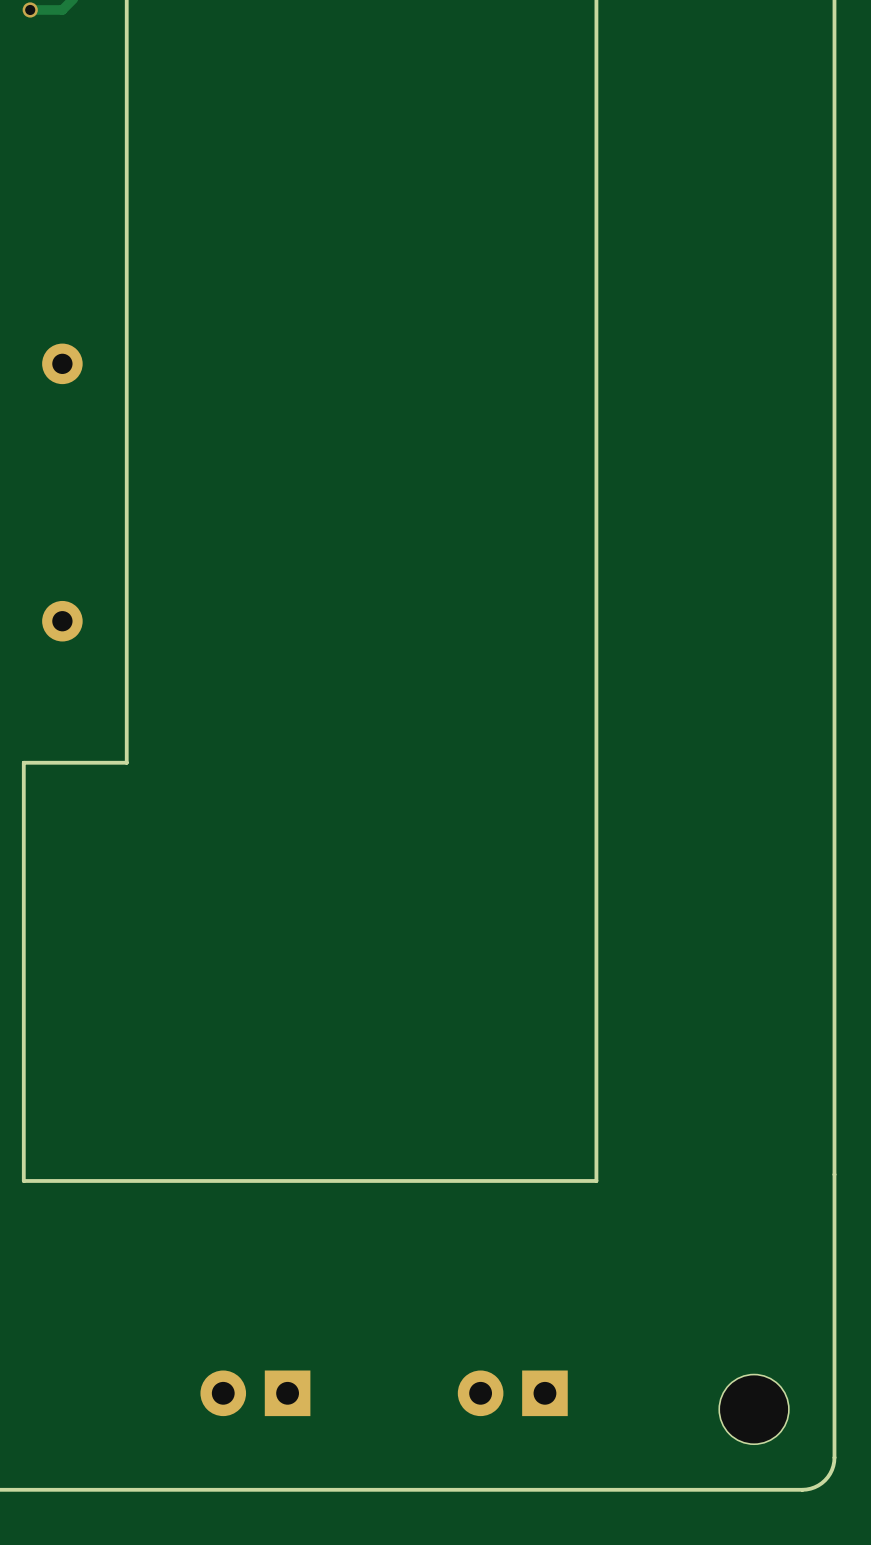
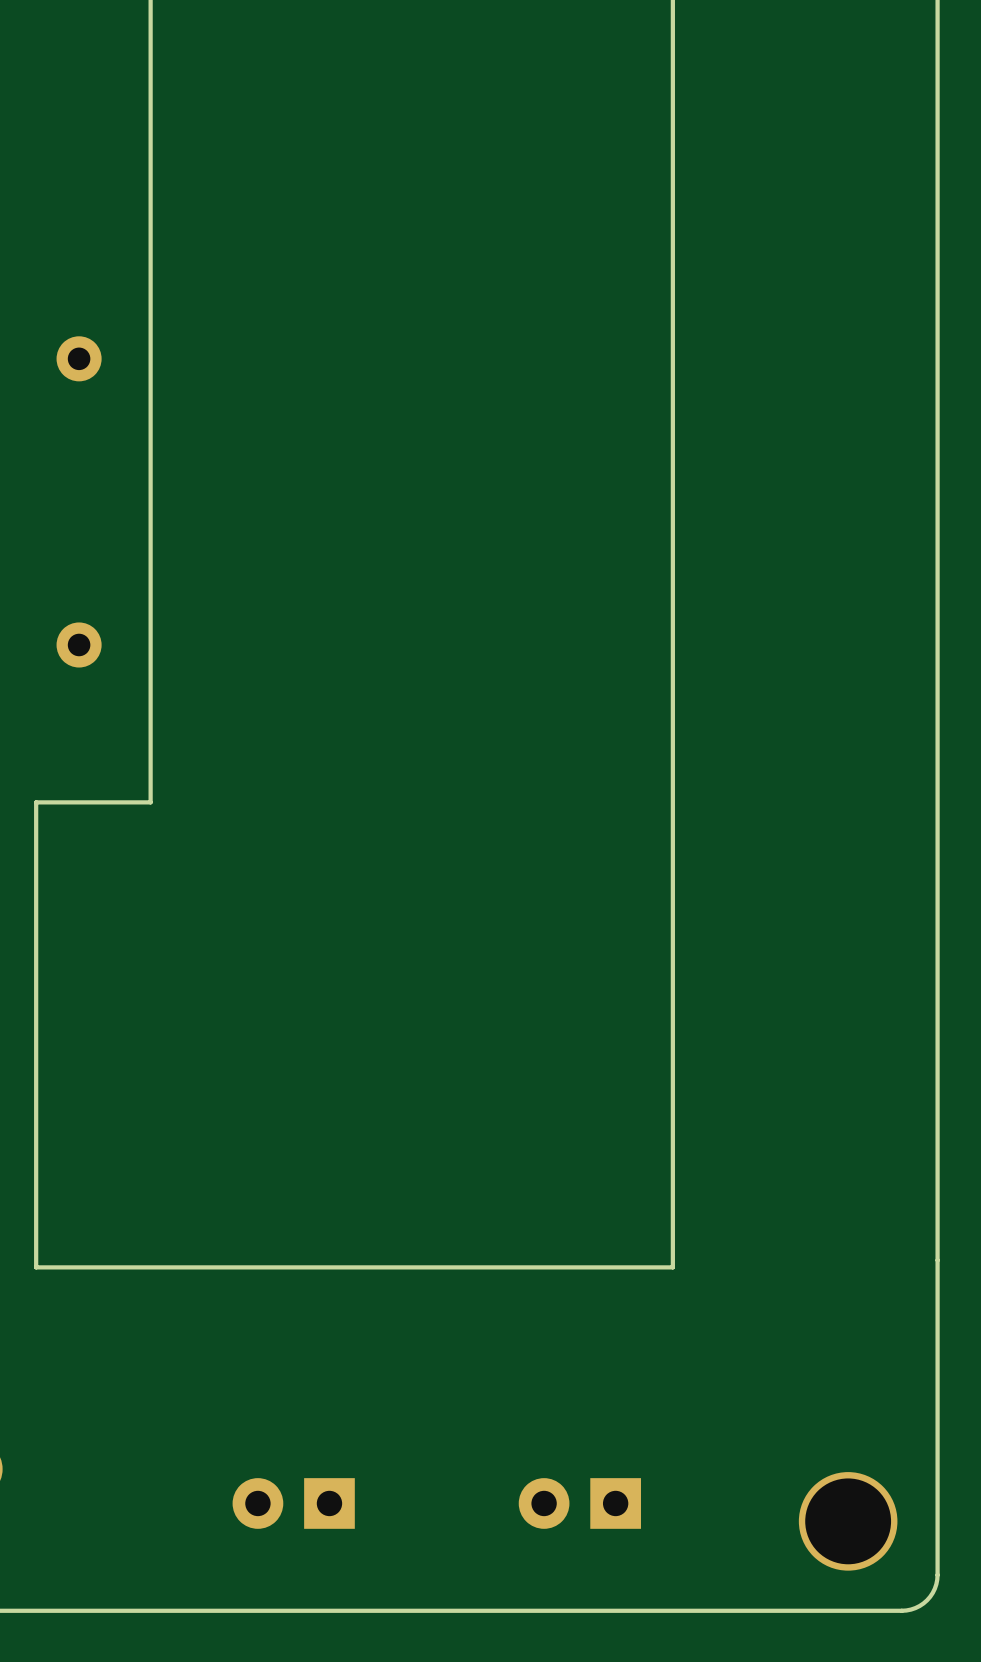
part footprint: [719, 1374, 789, 1445] -> [798, 1472, 898, 1571]

